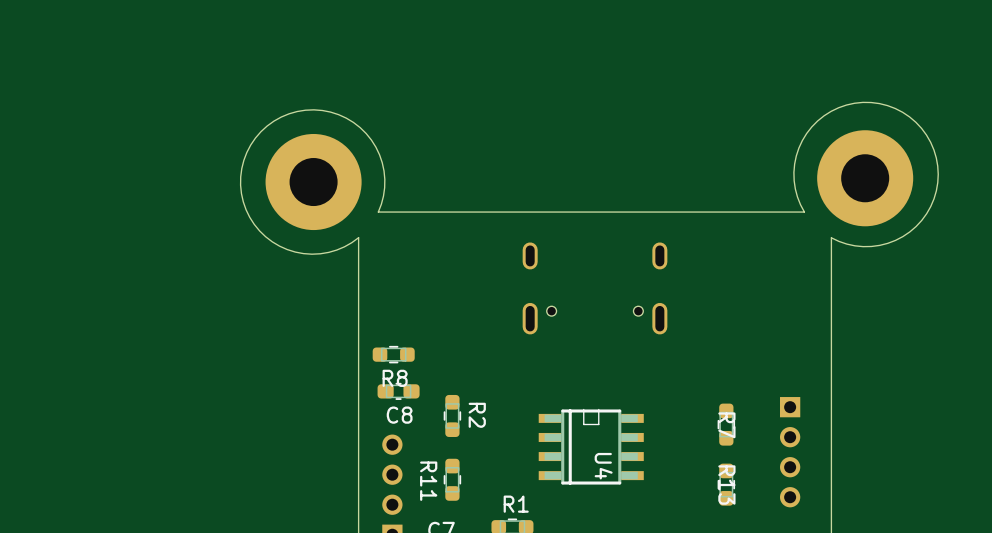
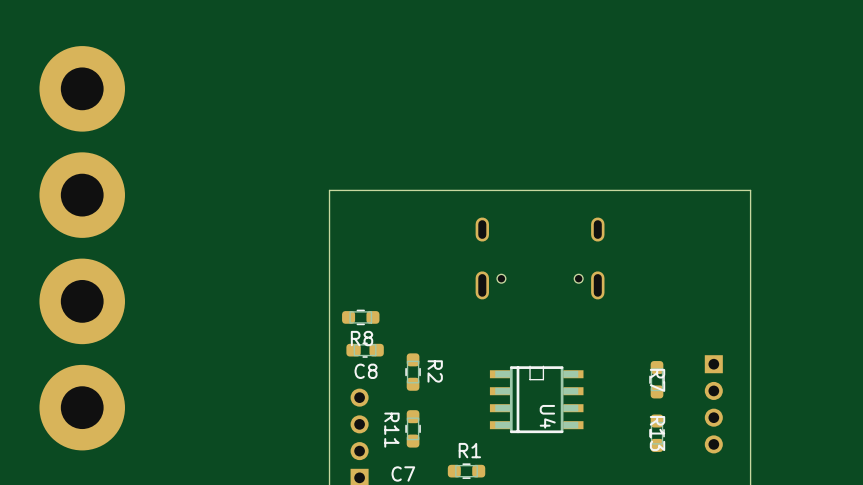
part: none -> (82, 88)
part: (865, 178) -> none
part: (313, 182) -> none
board edge: (378, 212) (384, 187) (382, 162) (371, 140) (353, 122) (330, 112) (305, 110) (289, 113) (274, 121) (255, 138) (243, 160) (240, 185) (246, 209) (259, 230) (279, 246) (295, 252) (311, 254) (336, 250) (358, 237) -> (347, 190) (329, 190) (329, 213)
board edge: (804, 212) (797, 196) (794, 180) (796, 155) (806, 133) (824, 115) (846, 105) (871, 102) (895, 108) (915, 122) (930, 142) (937, 166) (936, 190) (926, 213) (909, 231) (895, 240) (879, 245) (854, 245) (831, 237) -> (726, 190) (750, 190) (750, 213)
part: none -> (82, 195)
part: none -> (82, 301)
part: none -> (82, 407)

